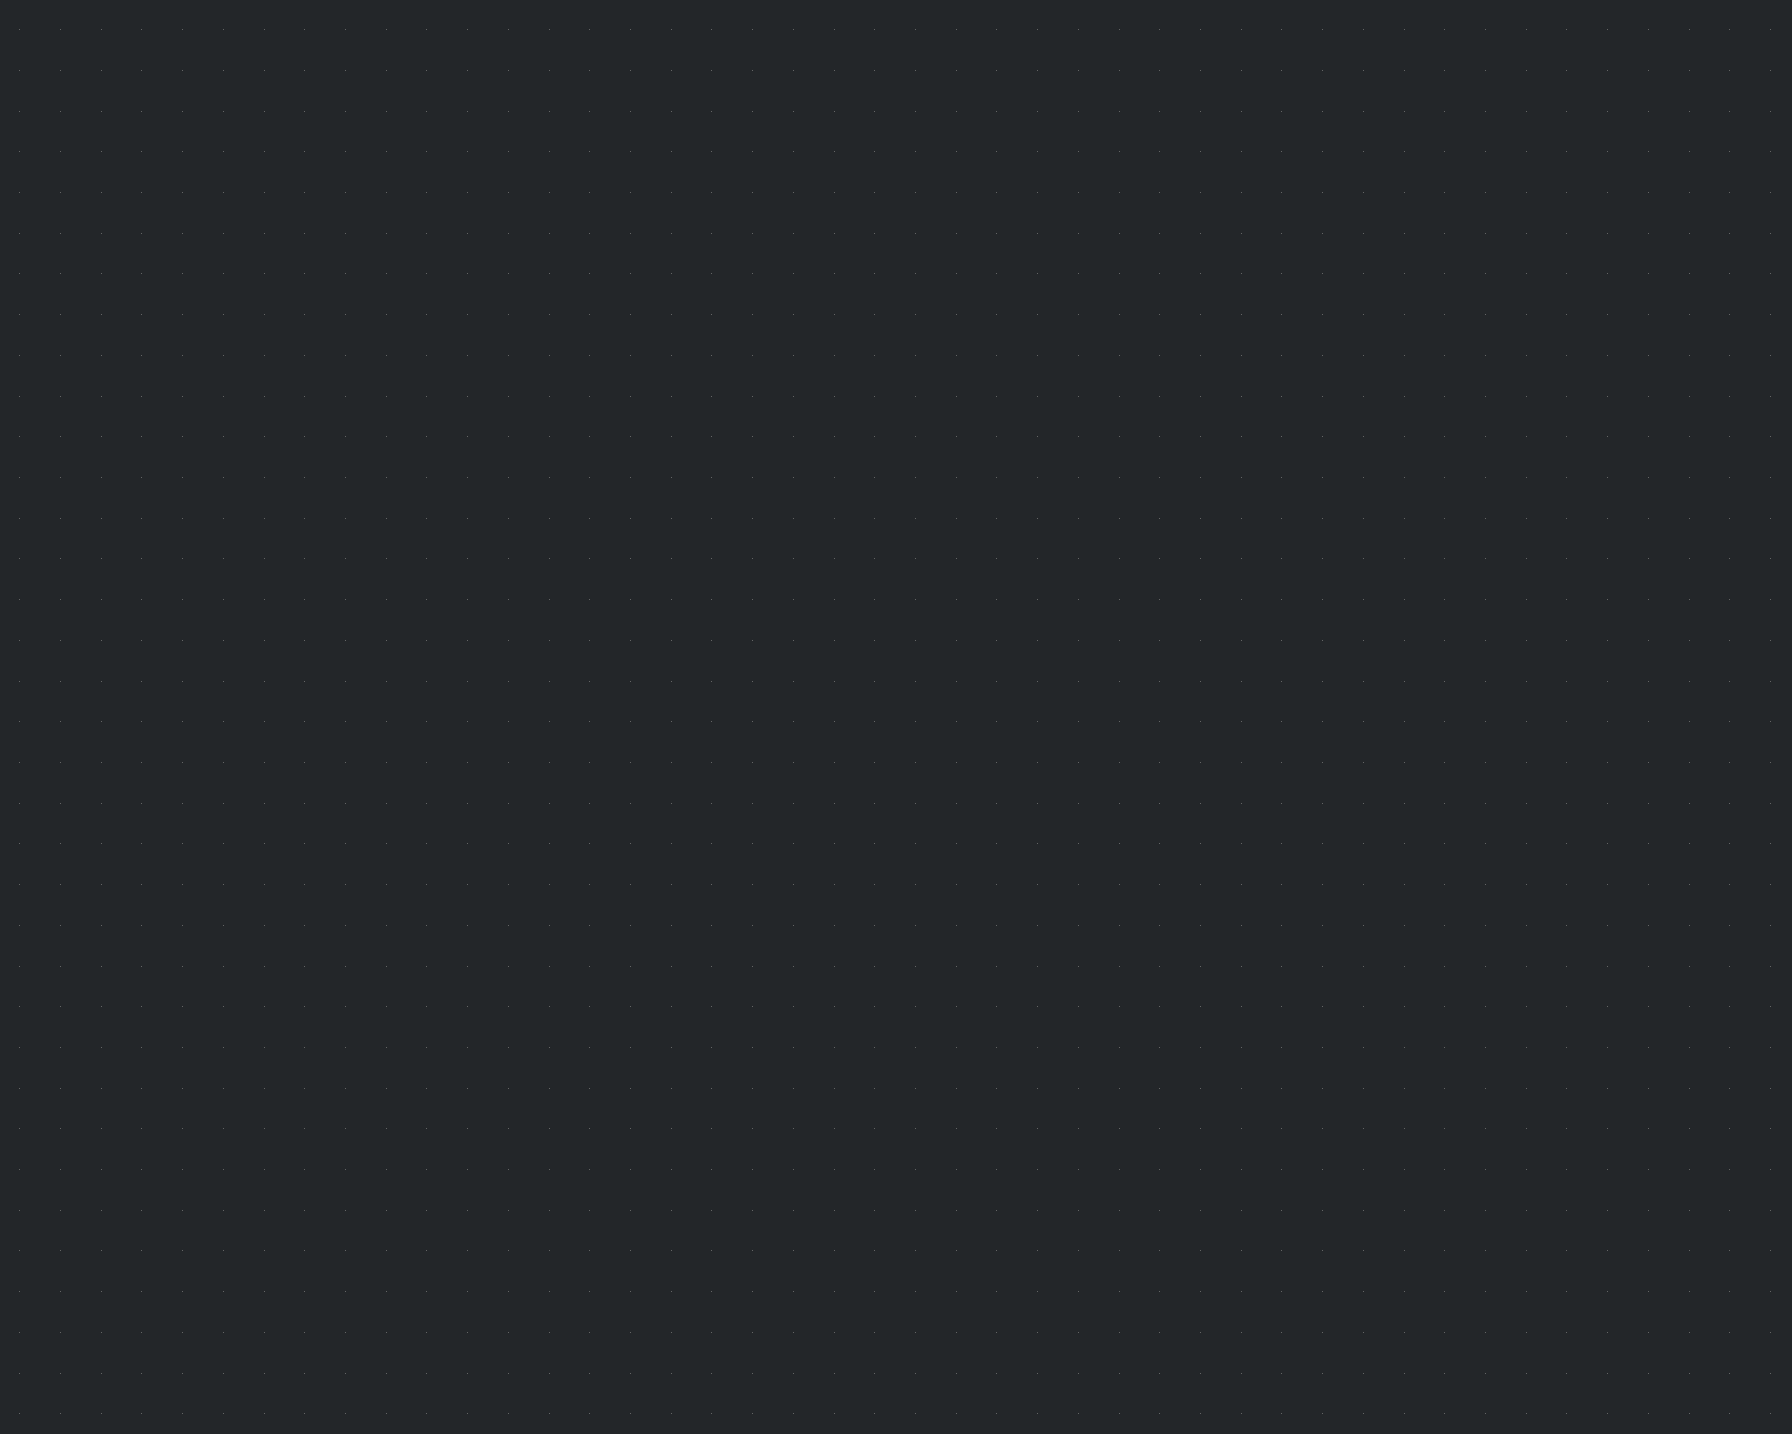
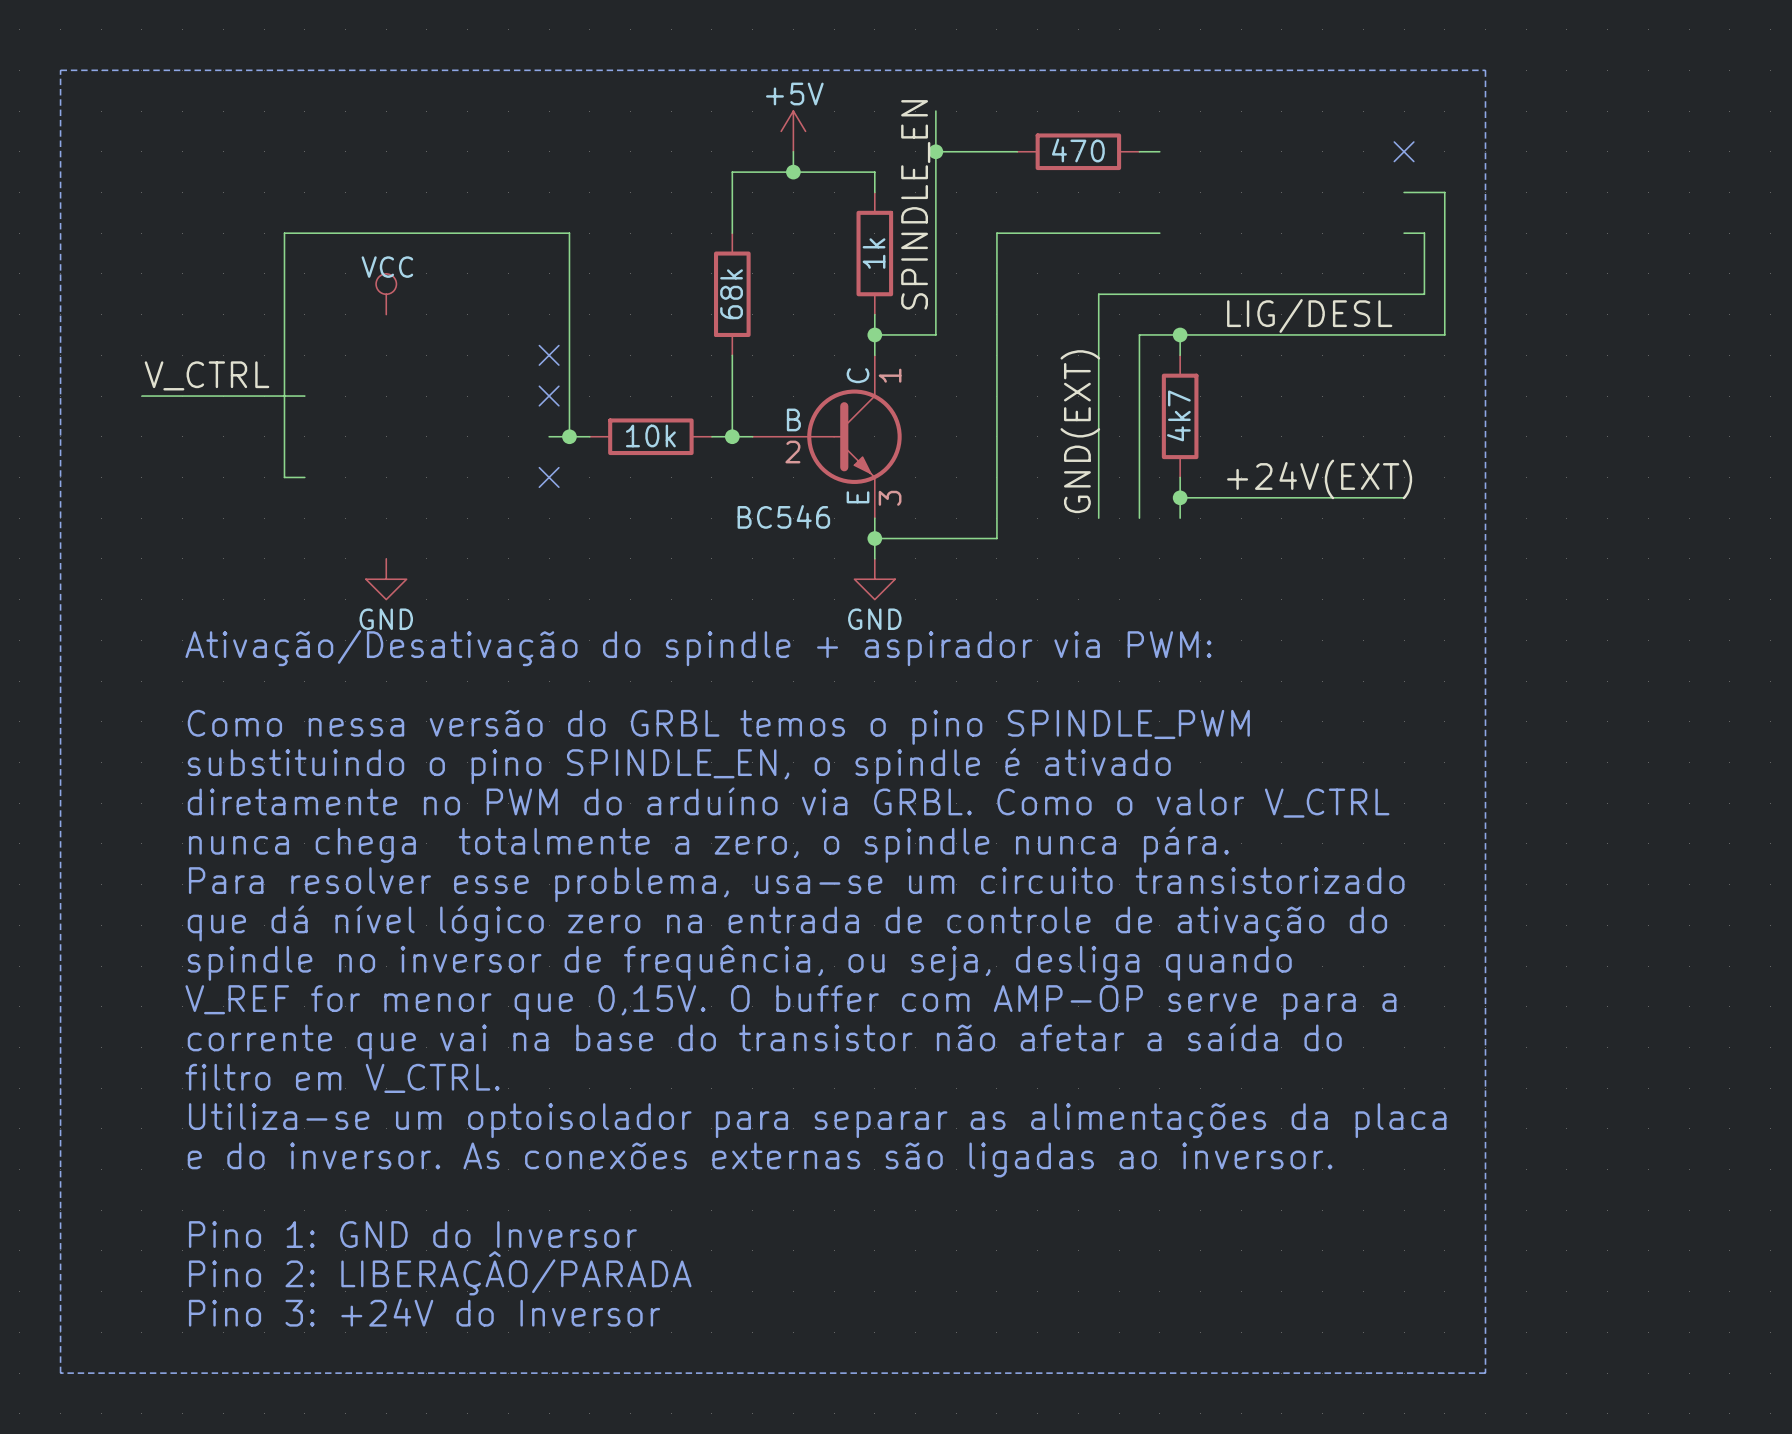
line: none -> (60, 70) (1485, 70) (1485, 1373) (60, 1373) (60, 70)
wire: none -> (935, 111) (935, 334) (874, 334)
power symbol: none -> +5V (793, 131)
wire: none -> (793, 151) (793, 172)
wire: none -> (935, 151) (1017, 151)
junction: none -> (935, 151)
part: none -> 470 (1078, 151)
wire: none -> (1139, 151) (1159, 151)
no-connect mark: none -> (1404, 151)
junction: none -> (793, 172)
wire: none -> (874, 192) (874, 172) (732, 172) (732, 233)
wire: none -> (1404, 192) (1444, 192) (1444, 334) (1139, 334) (1139, 518)
label: none -> SPINDLE_EN (915, 204)
wire: none -> (1159, 233) (996, 233) (996, 538) (874, 538)
wire: none -> (1404, 233) (1424, 233) (1424, 294) (1098, 294) (1098, 518)
part: none -> 1k (874, 253)
power symbol: none -> VCC (386, 294)
part: none -> 68k (732, 294)
wire: none -> (874, 314) (874, 355)
label: none -> LIG/DESL (1309, 315)
junction: none -> (874, 334)
wire: none -> (1180, 334) (1180, 355)
junction: none -> (1180, 334)
no-connect mark: none -> (549, 355)
wire: none -> (732, 355) (732, 436)
label: none -> V_CTRL (206, 375)
wire: none -> (141, 396) (304, 396)
no-connect mark: none -> (549, 396)
part: none -> 4k7 (1180, 416)
label: none -> GND(EXT) (1080, 431)
wire: none -> (549, 436) (589, 436)
wire: none -> (569, 436) (569, 233) (284, 233) (284, 477) (304, 477)
junction: none -> (569, 436)
part: none -> 10k (650, 436)
wire: none -> (711, 436) (752, 436)
junction: none -> (732, 436)
part: none -> BC546 (827, 436)
no-connect mark: none -> (549, 477)
wire: none -> (1180, 477) (1180, 518)
label: none -> +24V(EXT) (1319, 479)
wire: none -> (1180, 497) (1404, 497)
junction: none -> (1180, 497)
wire: none -> (874, 518) (874, 558)
junction: none -> (874, 538)
power symbol: none -> GND (386, 579)
power symbol: none -> GND (874, 579)
text: none -> Ativação/Desativação do spindle + aspirador via PWM: (698, 648)
text: none -> Como nessa versão do GRBL temos o pino SPINDLE_PWM (718, 727)
text: none -> substituindo o pino SPINDLE_EN, o spindle é ativado (679, 766)
text: none -> diretamente no PWM do arduíno via GRBL. Como o valor V_CTRL (788, 802)
text: none -> nunca chega totalmente a zero, o spindle nunca pára. (708, 844)
text: none -> Para resolver esse problema, usa-se um circuito transistorizado (796, 884)
text: none -> que dá nível lógico zero na entrada de controle de ativação do (787, 923)
text: none -> spindle no inversor de frequência, ou seja, desliga quando (739, 962)
text: none -> V_REF for menor que 0,15V. O buffer com AMP-OP serve para a (790, 1002)
text: none -> corrente que vai na base do transistor não afetar a saída do (764, 1041)
text: none -> filtro em V_CTRL. (342, 1078)
text: none -> Utiliza-se um optoisolador para separar as alimentações da placa (817, 1120)
text: none -> e do inversor. As conexões externas são ligadas ao inversor. (760, 1159)
text: none -> Pino 1: GND do Inversor (412, 1234)
text: none -> Pino 2: LIBERAÇÂO/PARADA (440, 1273)
text: none -> Pino 3: +24V do Inversor (424, 1312)

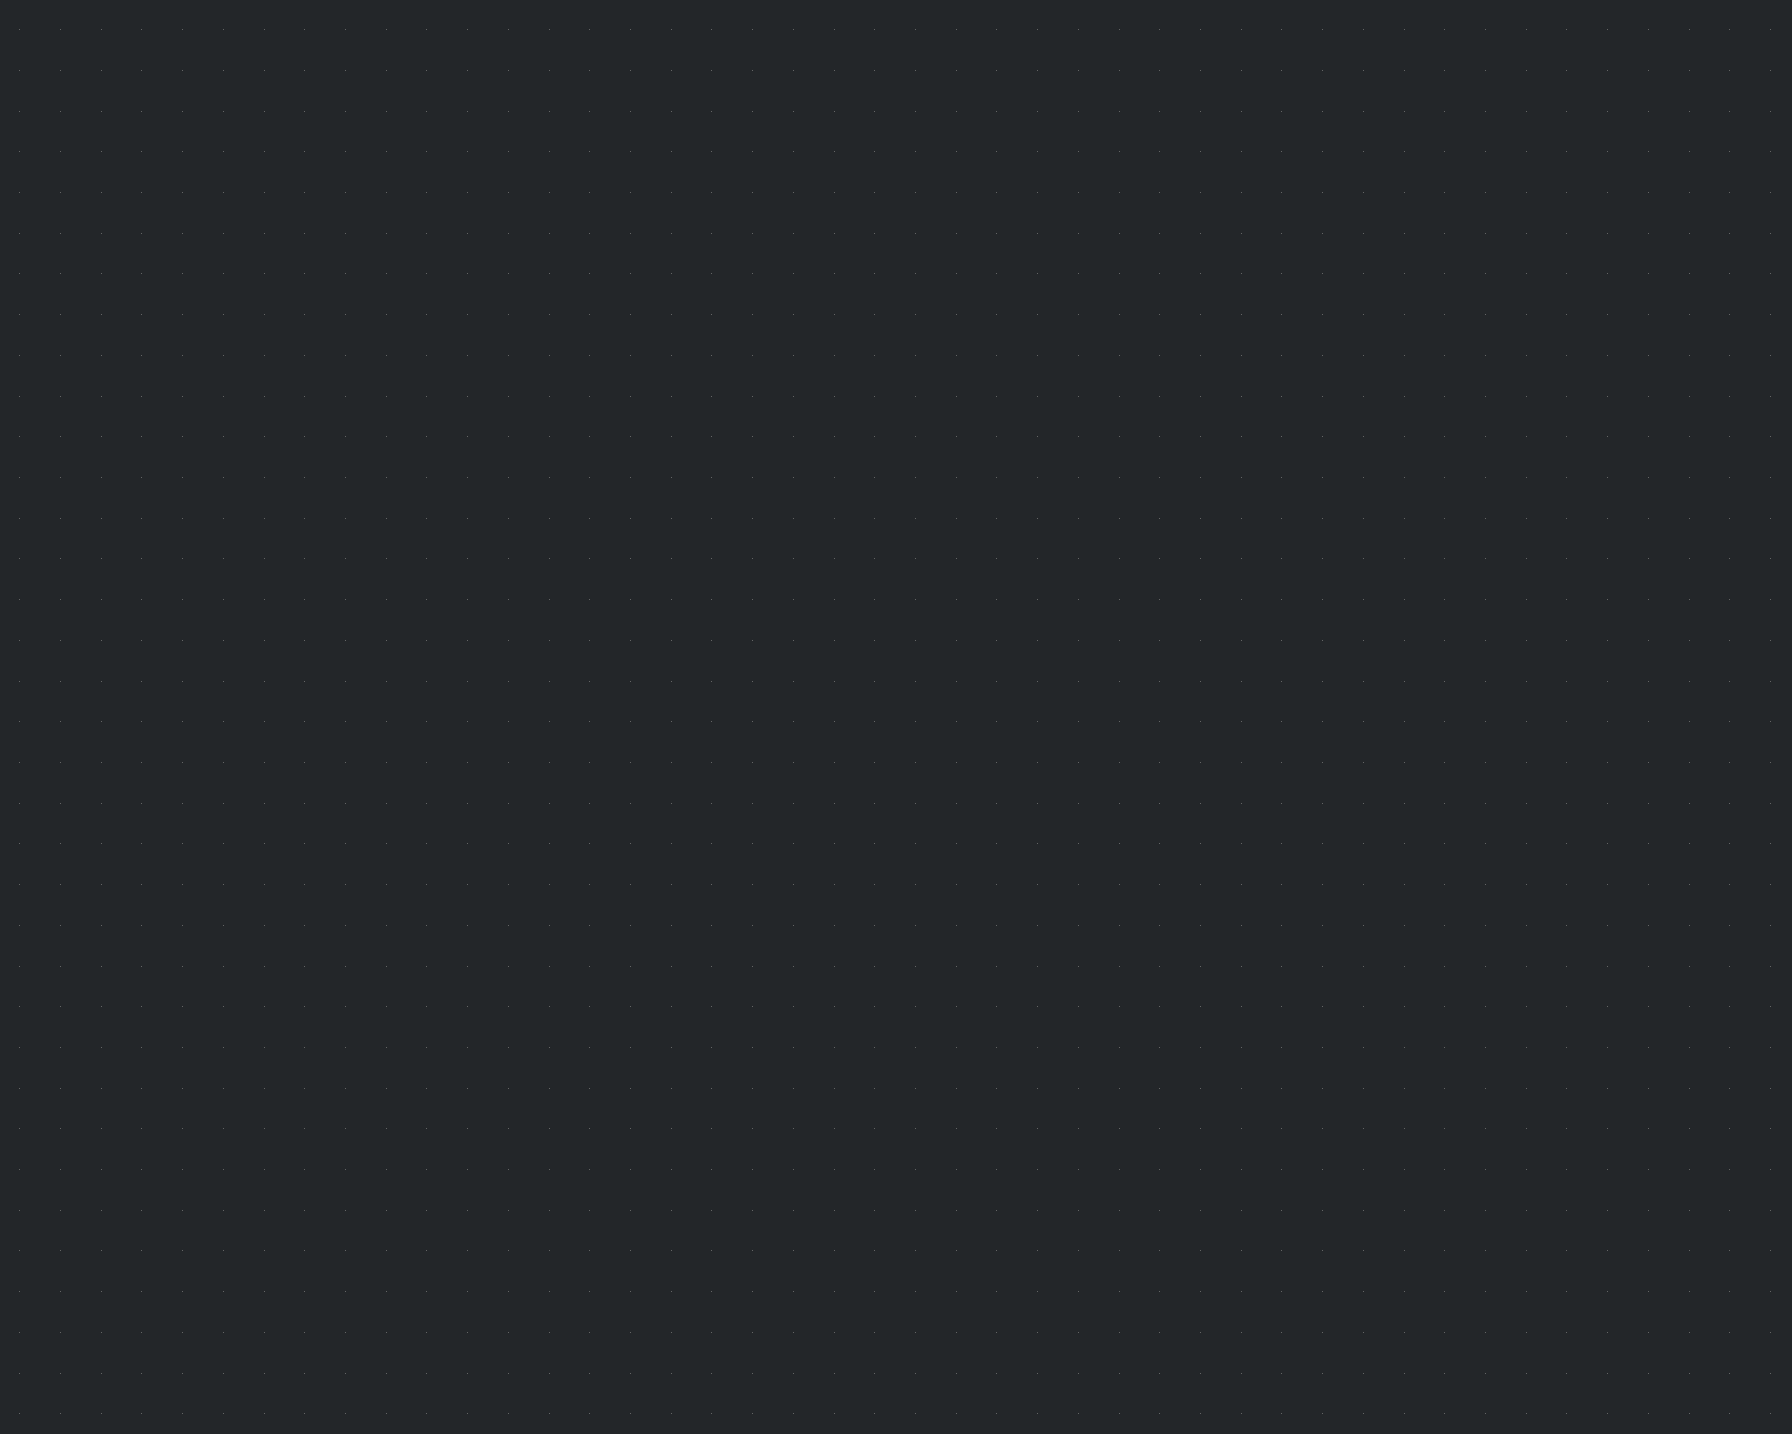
line: (60, 70) (1485, 70) (1485, 1373) (60, 1373) (60, 70) -> none
wire: (935, 111) (935, 334) (874, 334) -> none
power symbol: +5V (793, 131) -> none
wire: (793, 151) (793, 172) -> none
wire: (935, 151) (1017, 151) -> none
junction: (935, 151) -> none
part: 470 (1078, 151) -> none
wire: (1139, 151) (1159, 151) -> none
no-connect mark: (1404, 151) -> none
junction: (793, 172) -> none
wire: (874, 192) (874, 172) (732, 172) (732, 233) -> none
wire: (1404, 192) (1444, 192) (1444, 334) (1139, 334) (1139, 518) -> none
label: SPINDLE_EN (915, 204) -> none
wire: (1159, 233) (996, 233) (996, 538) (874, 538) -> none
wire: (1404, 233) (1424, 233) (1424, 294) (1098, 294) (1098, 518) -> none
part: 1k (874, 253) -> none
power symbol: VCC (386, 294) -> none
part: 68k (732, 294) -> none
wire: (874, 314) (874, 355) -> none
label: LIG/DESL (1309, 315) -> none
junction: (874, 334) -> none
wire: (1180, 334) (1180, 355) -> none
junction: (1180, 334) -> none
no-connect mark: (549, 355) -> none
wire: (732, 355) (732, 436) -> none
label: V_CTRL (206, 375) -> none
wire: (141, 396) (304, 396) -> none
no-connect mark: (549, 396) -> none
part: 4k7 (1180, 416) -> none
label: GND(EXT) (1080, 431) -> none
wire: (549, 436) (589, 436) -> none
wire: (569, 436) (569, 233) (284, 233) (284, 477) (304, 477) -> none
junction: (569, 436) -> none
part: 10k (650, 436) -> none
wire: (711, 436) (752, 436) -> none
junction: (732, 436) -> none
part: BC546 (827, 436) -> none
no-connect mark: (549, 477) -> none
wire: (1180, 477) (1180, 518) -> none
label: +24V(EXT) (1319, 479) -> none
wire: (1180, 497) (1404, 497) -> none
junction: (1180, 497) -> none
wire: (874, 518) (874, 558) -> none
junction: (874, 538) -> none
power symbol: GND (386, 579) -> none
power symbol: GND (874, 579) -> none
text: Ativação/Desativação do spindle + aspirador via PWM: (698, 648) -> none
text: Como nessa versão do GRBL temos o pino SPINDLE_PWM (718, 727) -> none
text: substituindo o pino SPINDLE_EN, o spindle é ativado (679, 766) -> none
text: diretamente no PWM do arduíno via GRBL. Como o valor V_CTRL (788, 802) -> none
text: nunca chega totalmente a zero, o spindle nunca pára. (708, 844) -> none
text: Para resolver esse problema, usa-se um circuito transistorizado (796, 884) -> none
text: que dá nível lógico zero na entrada de controle de ativação do (787, 923) -> none
text: spindle no inversor de frequência, ou seja, desliga quando (739, 962) -> none
text: V_REF for menor que 0,15V. O buffer com AMP-OP serve para a (790, 1002) -> none
text: corrente que vai na base do transistor não afetar a saída do (764, 1041) -> none
text: filtro em V_CTRL. (342, 1078) -> none
text: Utiliza-se um optoisolador para separar as alimentações da placa (817, 1120) -> none
text: e do inversor. As conexões externas são ligadas ao inversor. (760, 1159) -> none
text: Pino 1: GND do Inversor (412, 1234) -> none
text: Pino 2: LIBERAÇÂO/PARADA (440, 1273) -> none
text: Pino 3: +24V do Inversor (424, 1312) -> none

